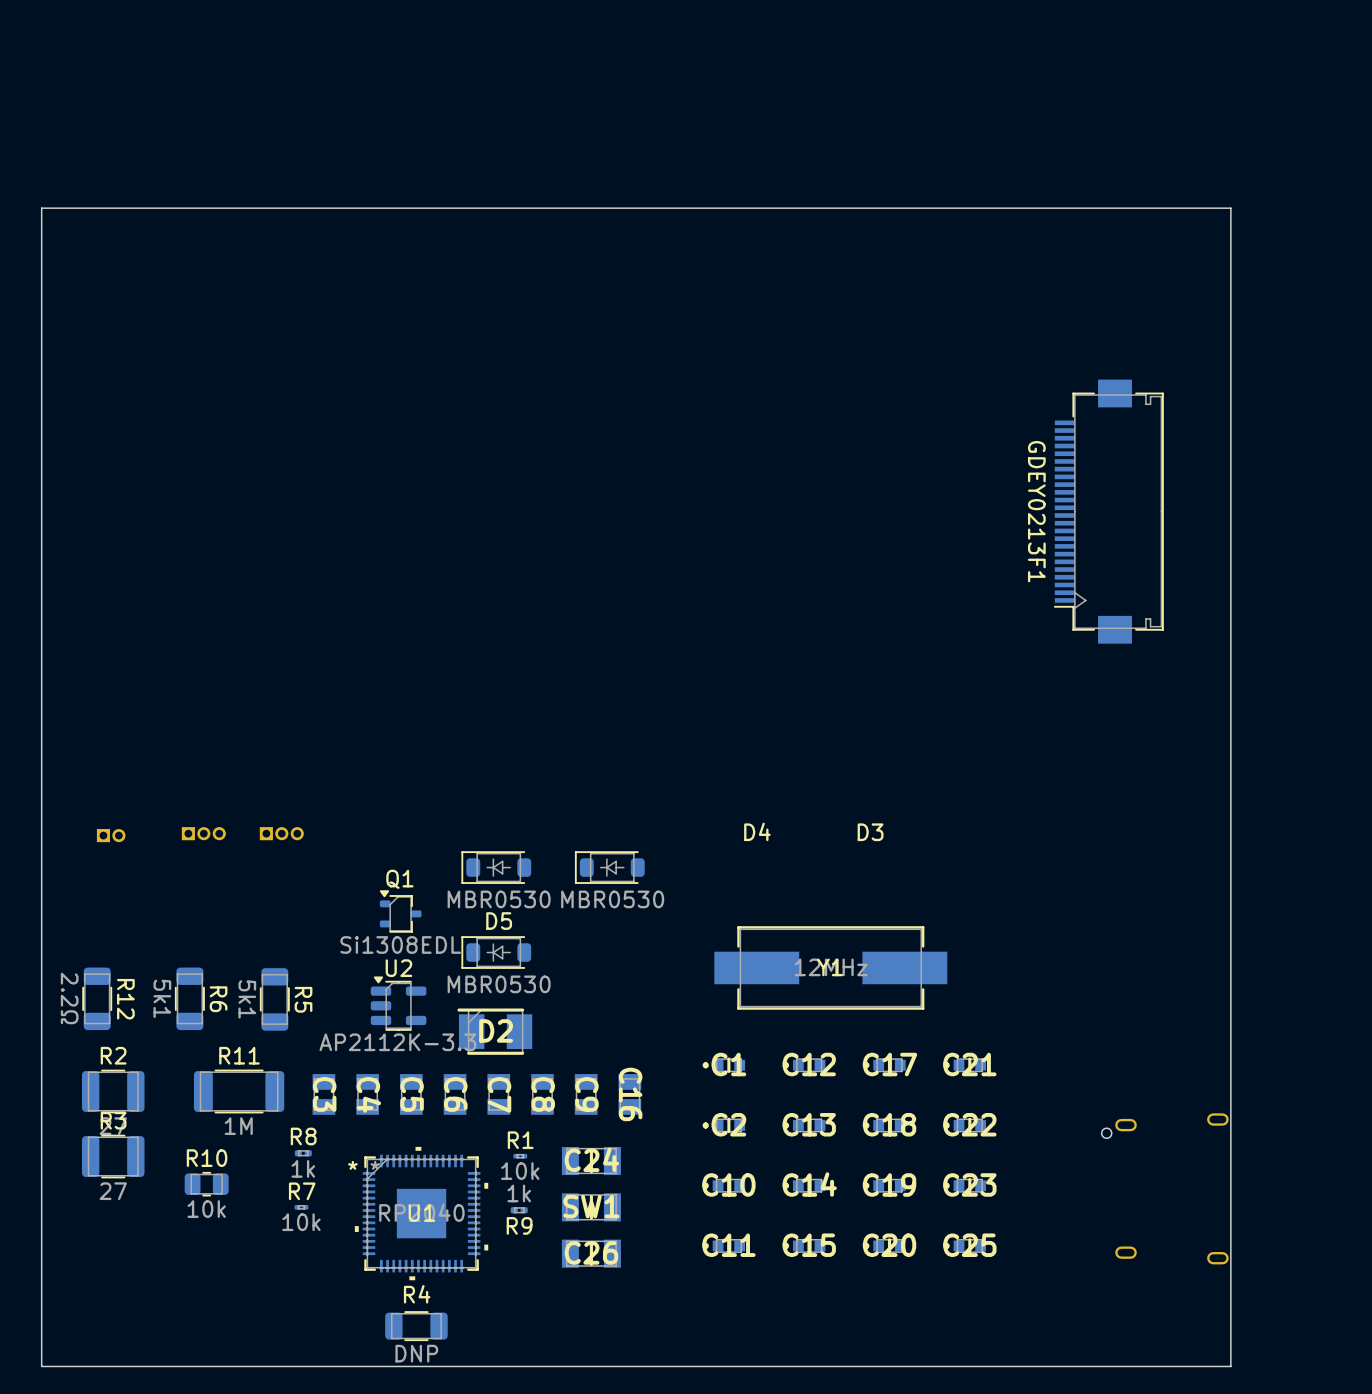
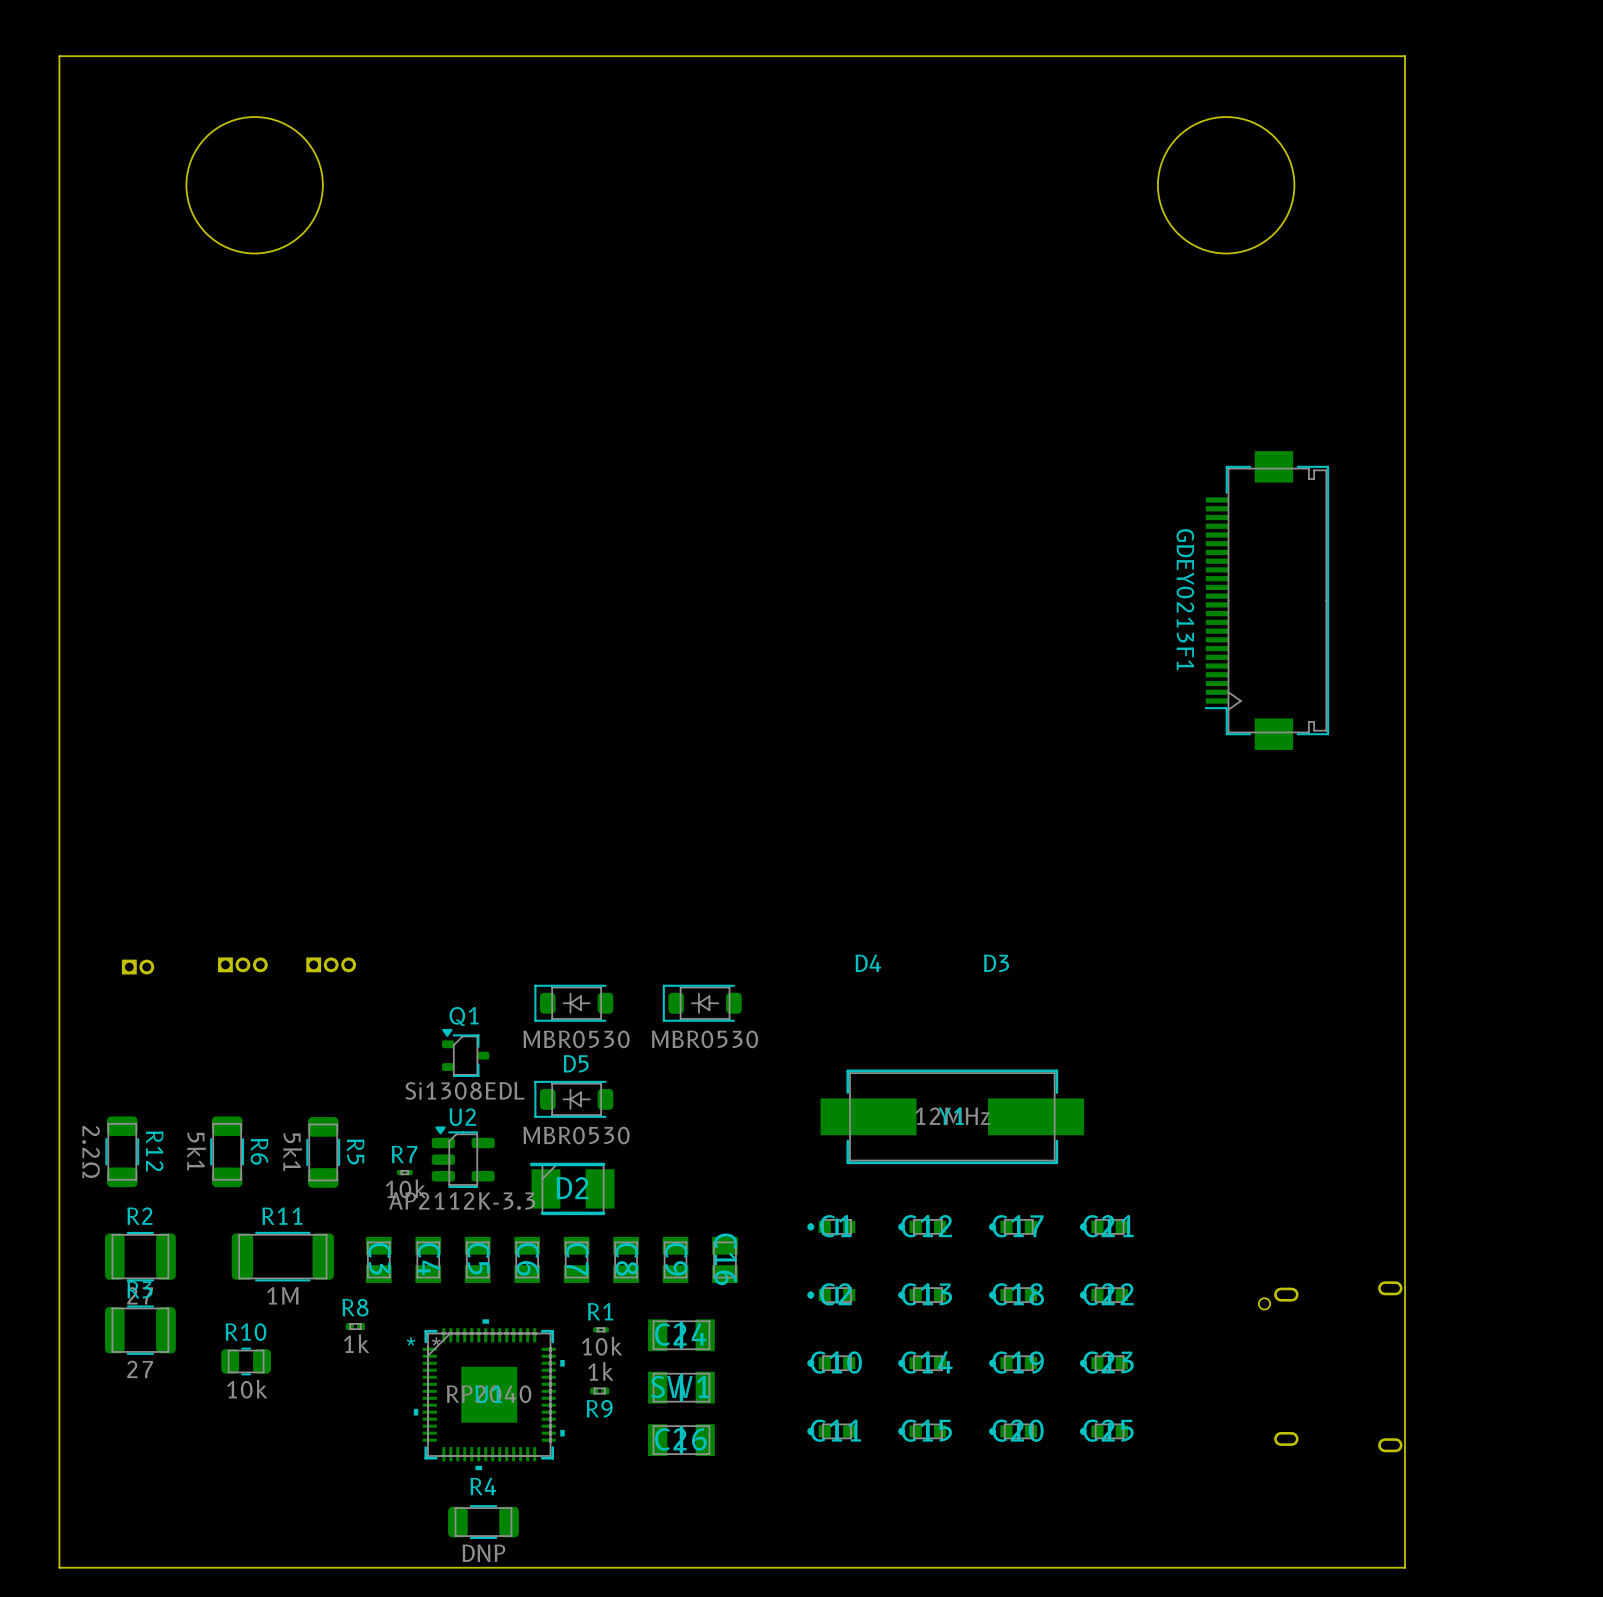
round board edge: none -> [185, 116, 324, 254]
round board edge: none -> [1157, 116, 1295, 254]
board edge: (1230, 208) (41, 208) -> (1404, 257) (1404, 56) (59, 56) (59, 257)
R7 position: (301, 1207) -> (404, 1172)

